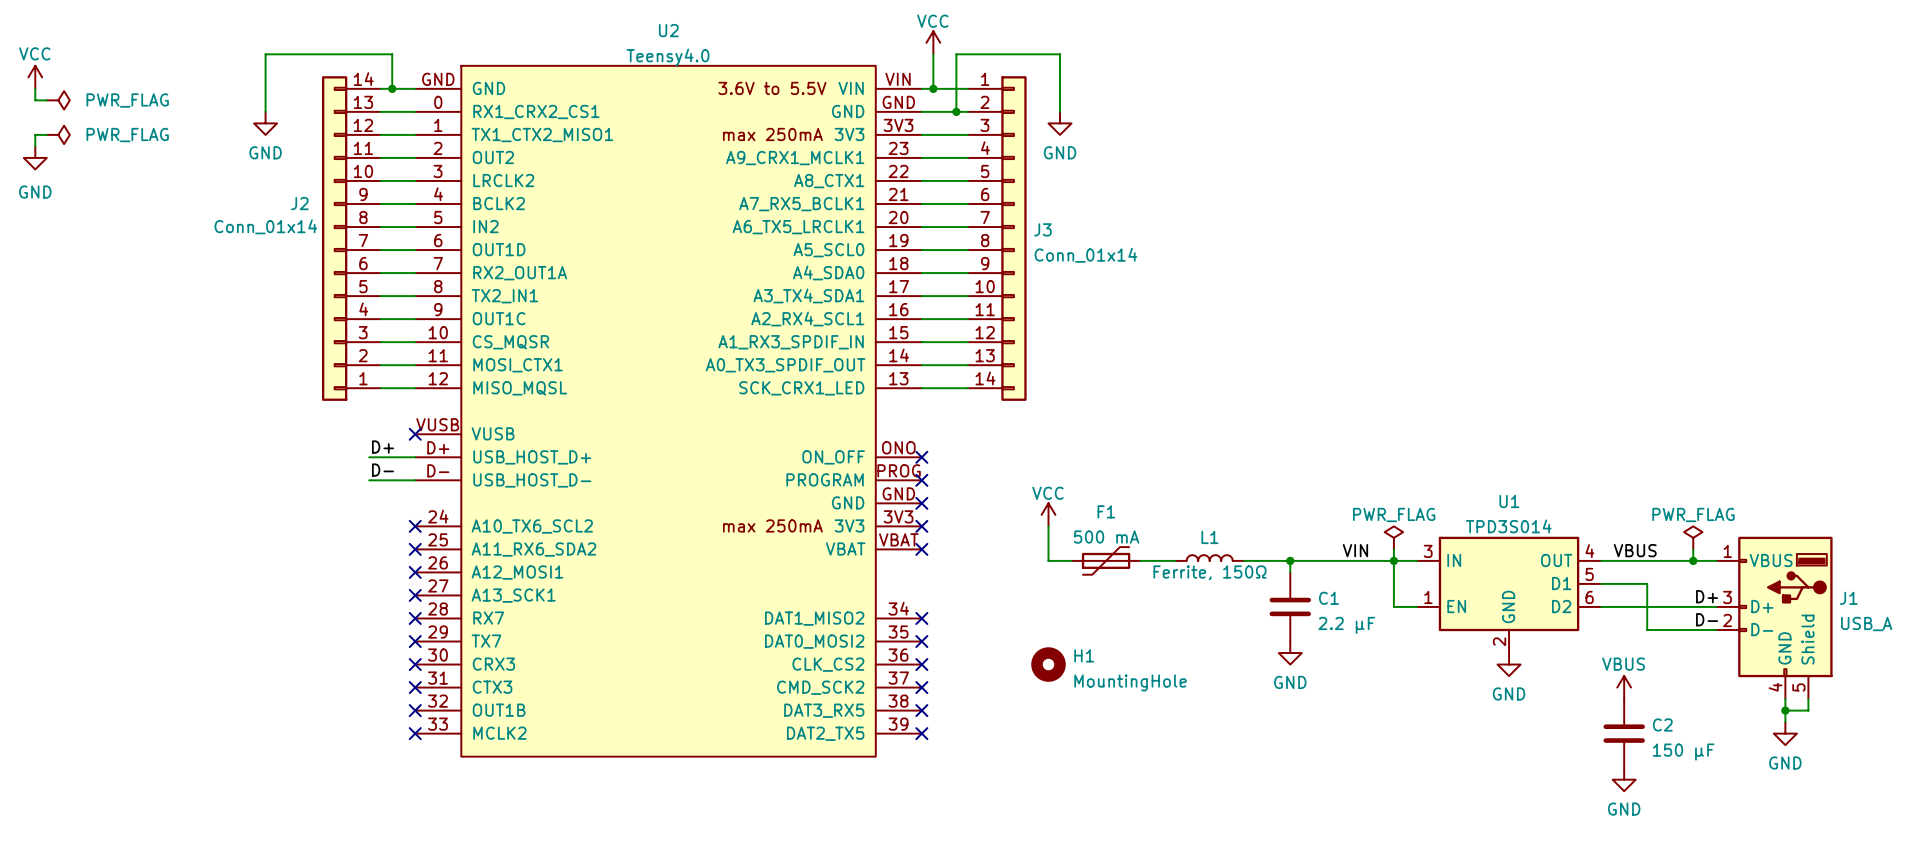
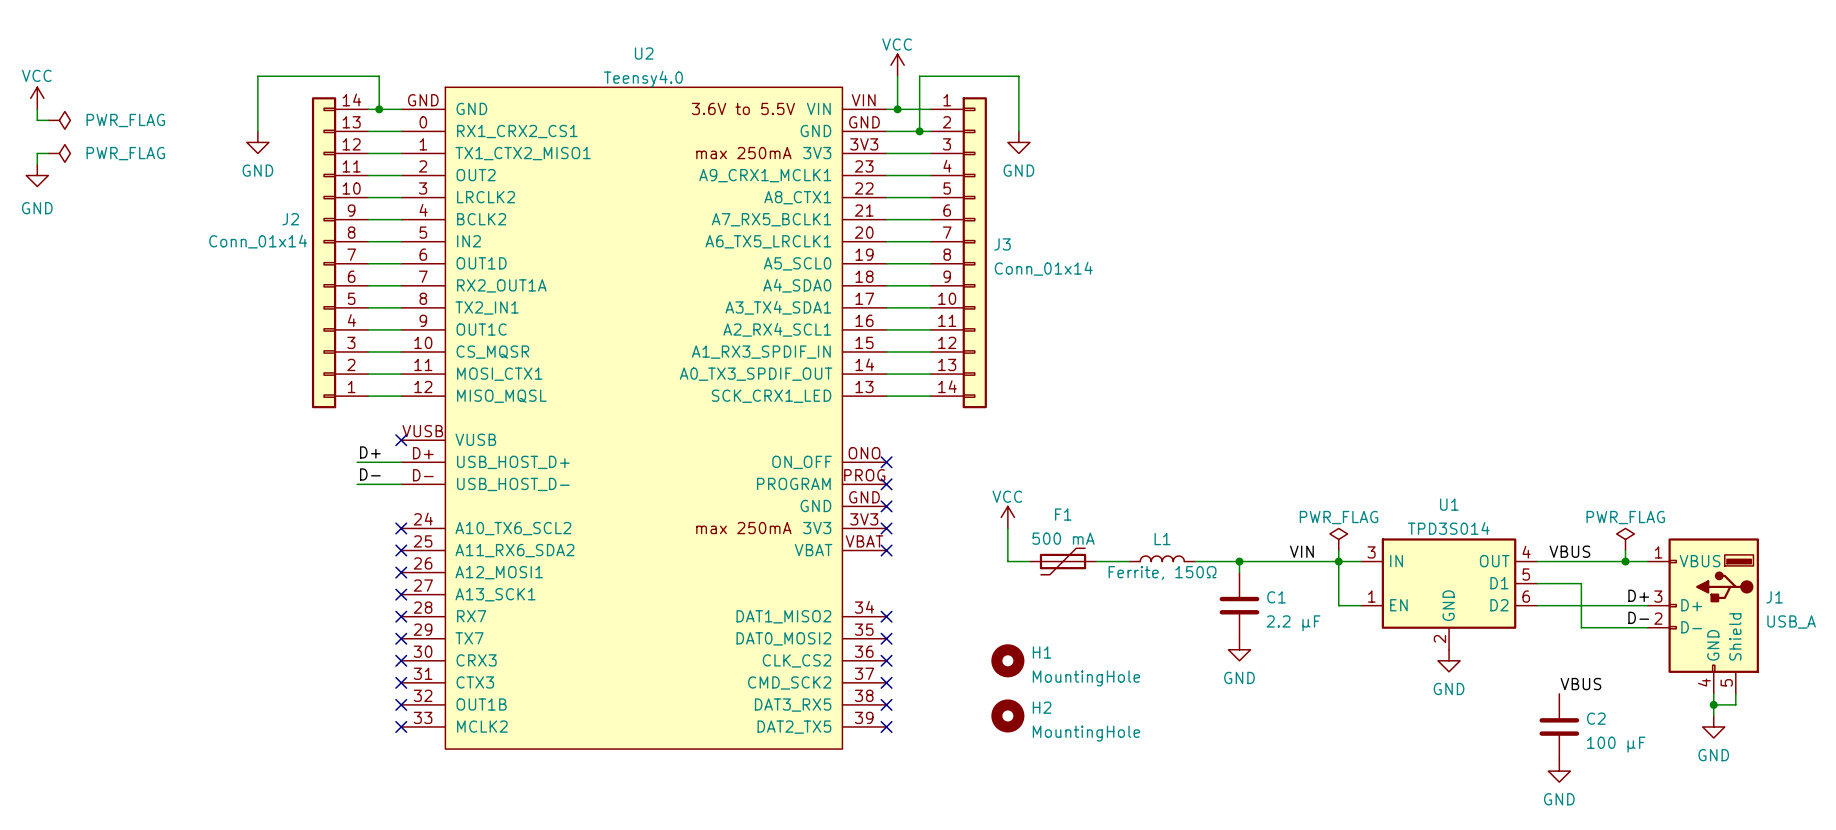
power symbol: VBUS (1624, 687) -> none
label: none -> VBUS (1580, 684)
H2: none -> MountingHole (1007, 715)
C2 value: 150 µF (1683, 752) -> 100 µF (1616, 744)

